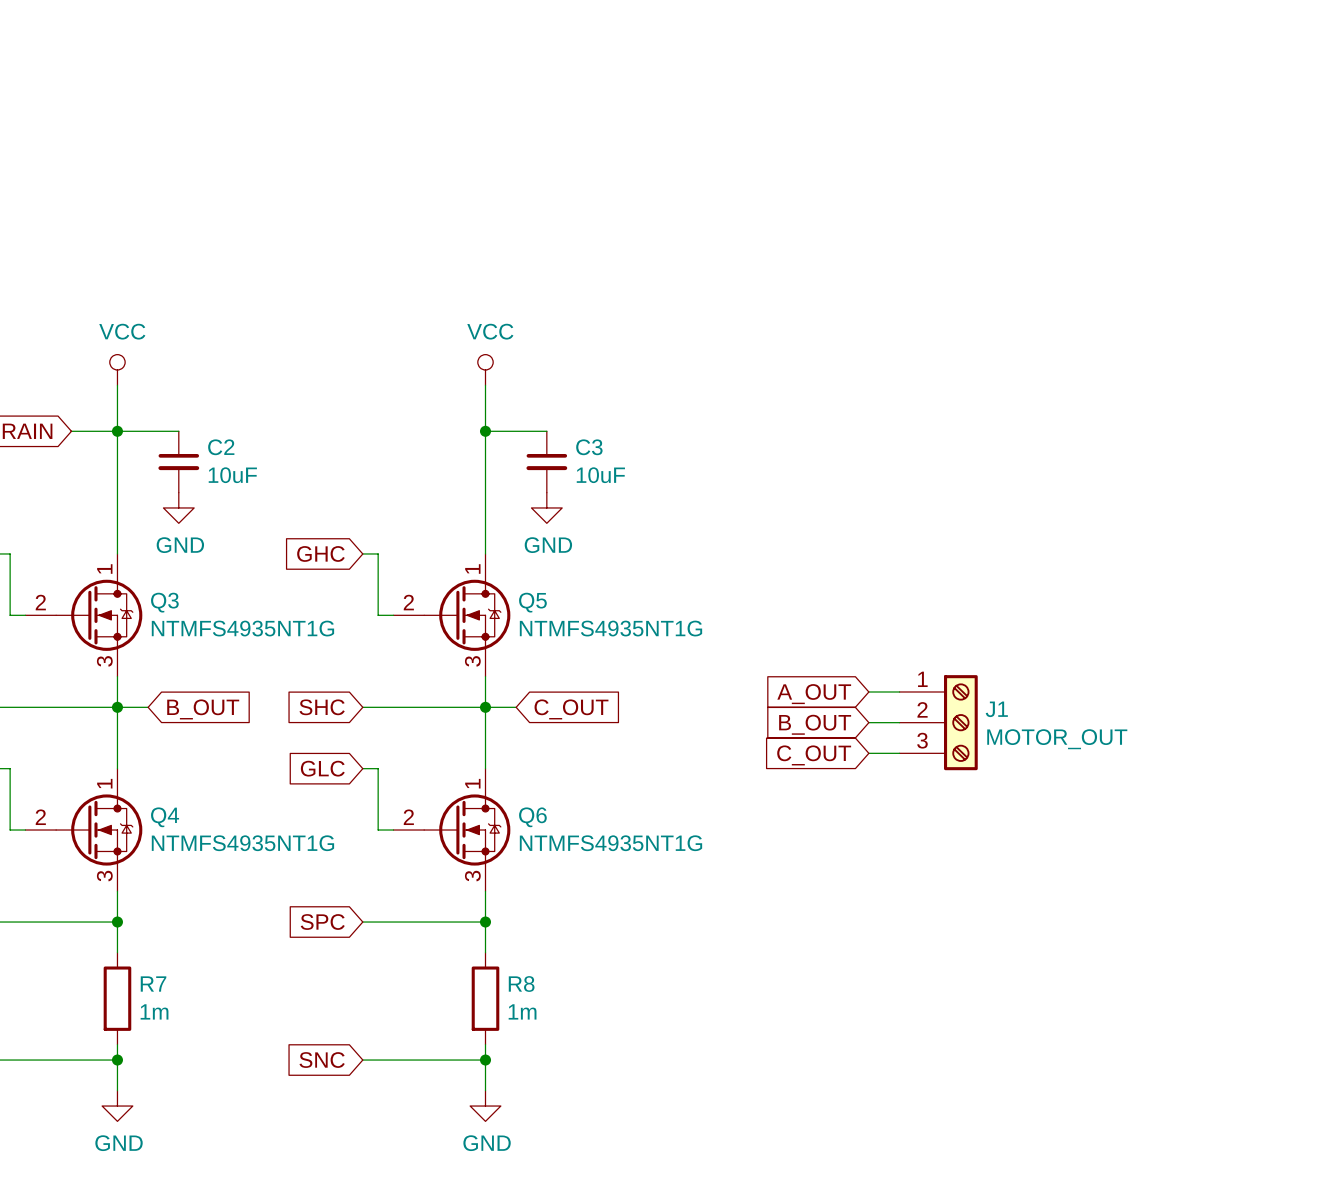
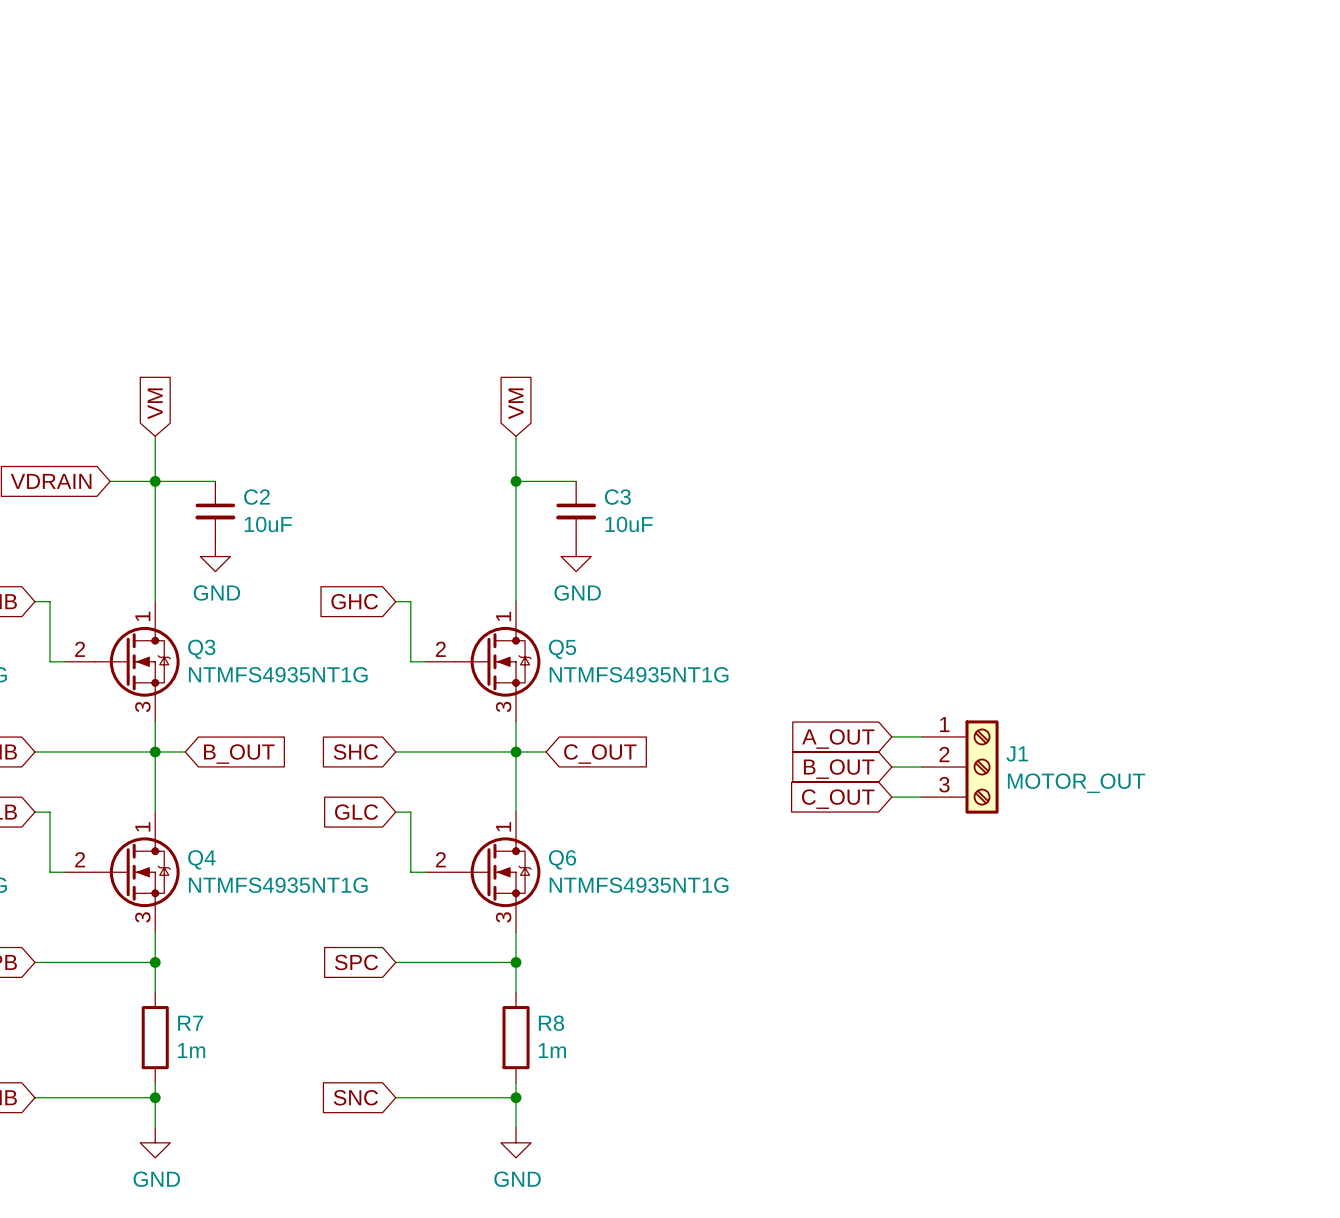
global label: none -> VM (155, 403)
global label: none -> VM (516, 403)
power symbol: VCC (117, 369) -> none
power symbol: VCC (485, 369) -> none

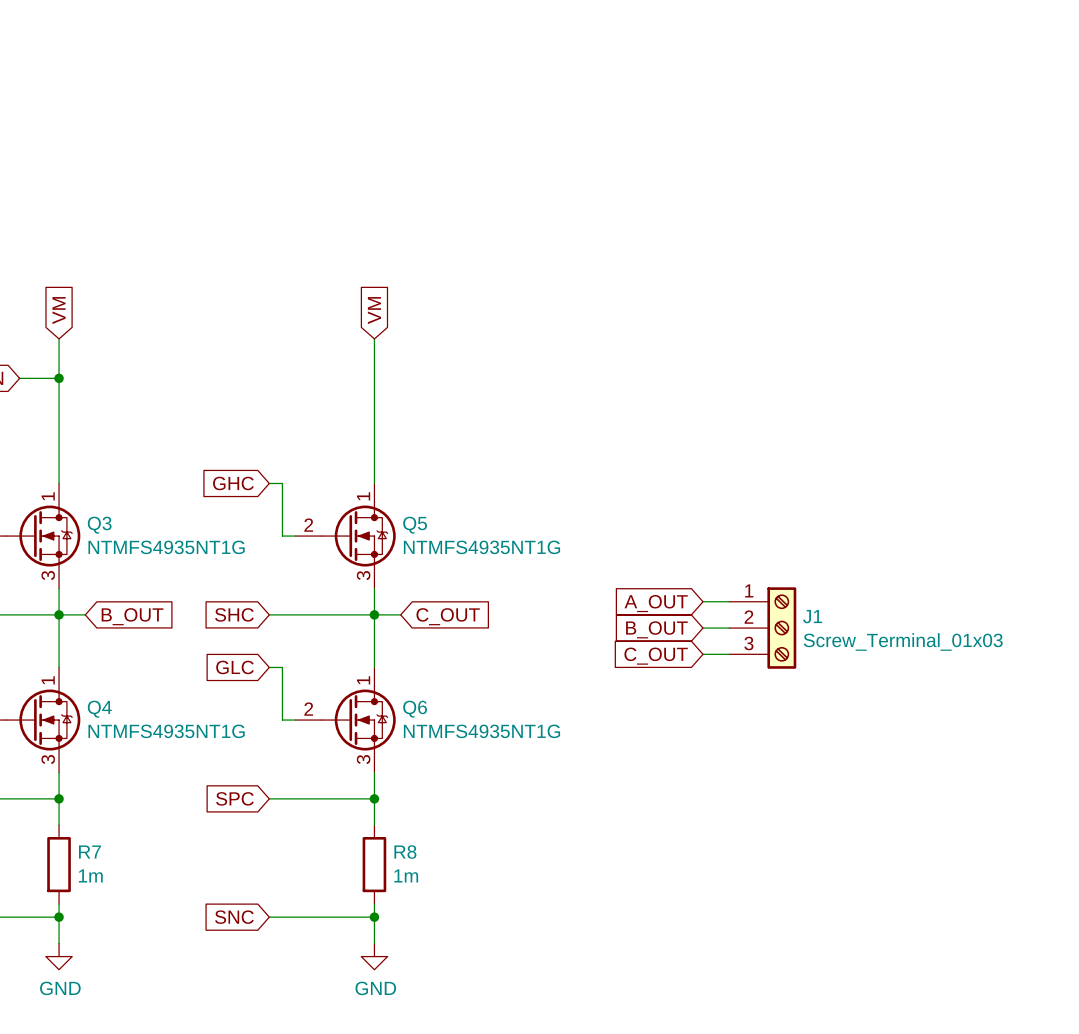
wire: (155, 481) (215, 481) -> none
wire: (516, 481) (576, 481) -> none
junction: (516, 481) -> none
C2: 10uF (215, 511) -> none
C3: 10uF (576, 511) -> none
power symbol: GND (215, 556) -> none
power symbol: GND (576, 556) -> none
J1 value: MOTOR_OUT (1076, 783) -> Screw_Terminal_01x03 (903, 641)

